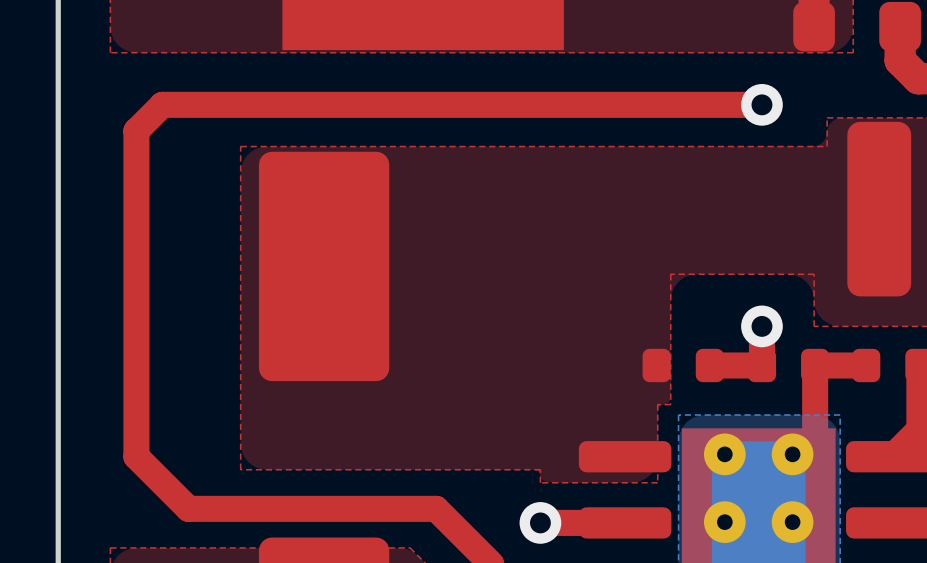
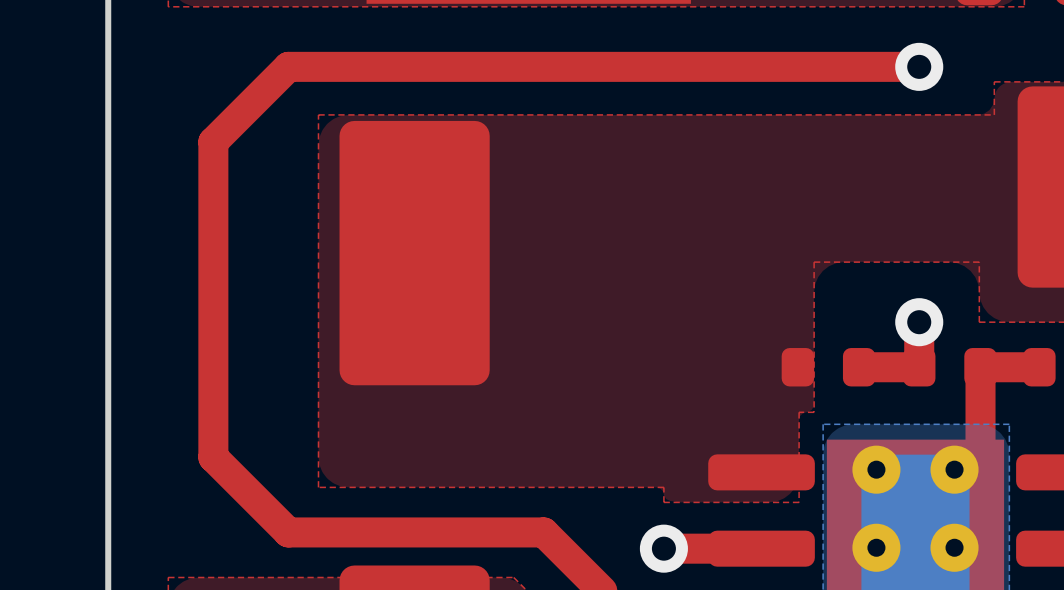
top track: (214, 104) (162, 104) (136, 130) (136, 456) (188, 508) (214, 508) -> (288, 66) (213, 141) (213, 457) (288, 532)

